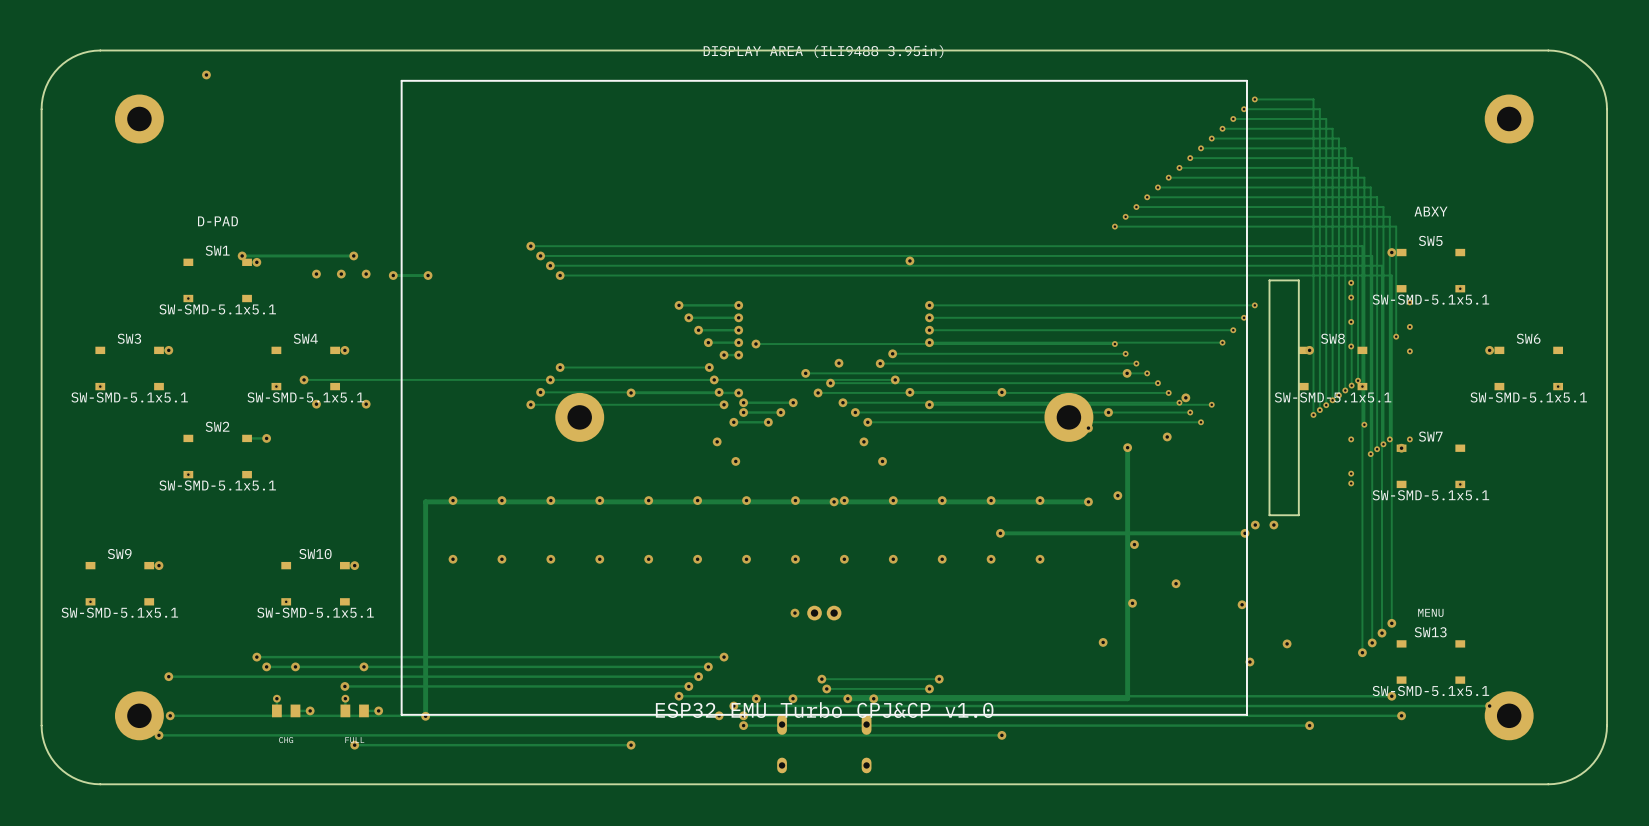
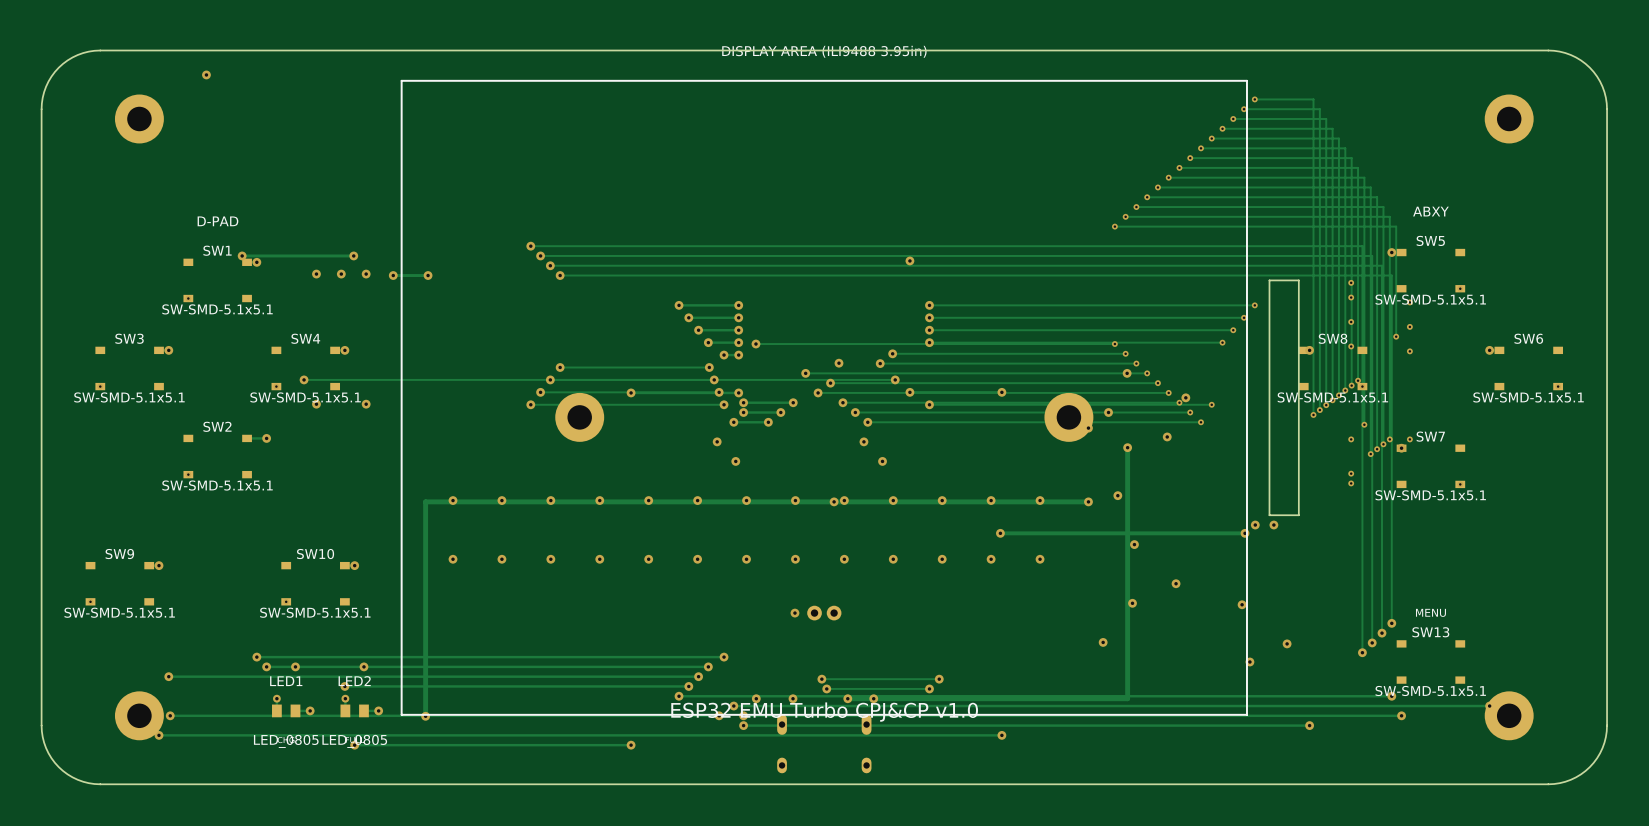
LED1 name: none -> LED1 (286, 681)
LED2 name: none -> LED2 (354, 681)
LED1 value: none -> LED_0805 (286, 741)
LED2 value: none -> LED_0805 (354, 741)

